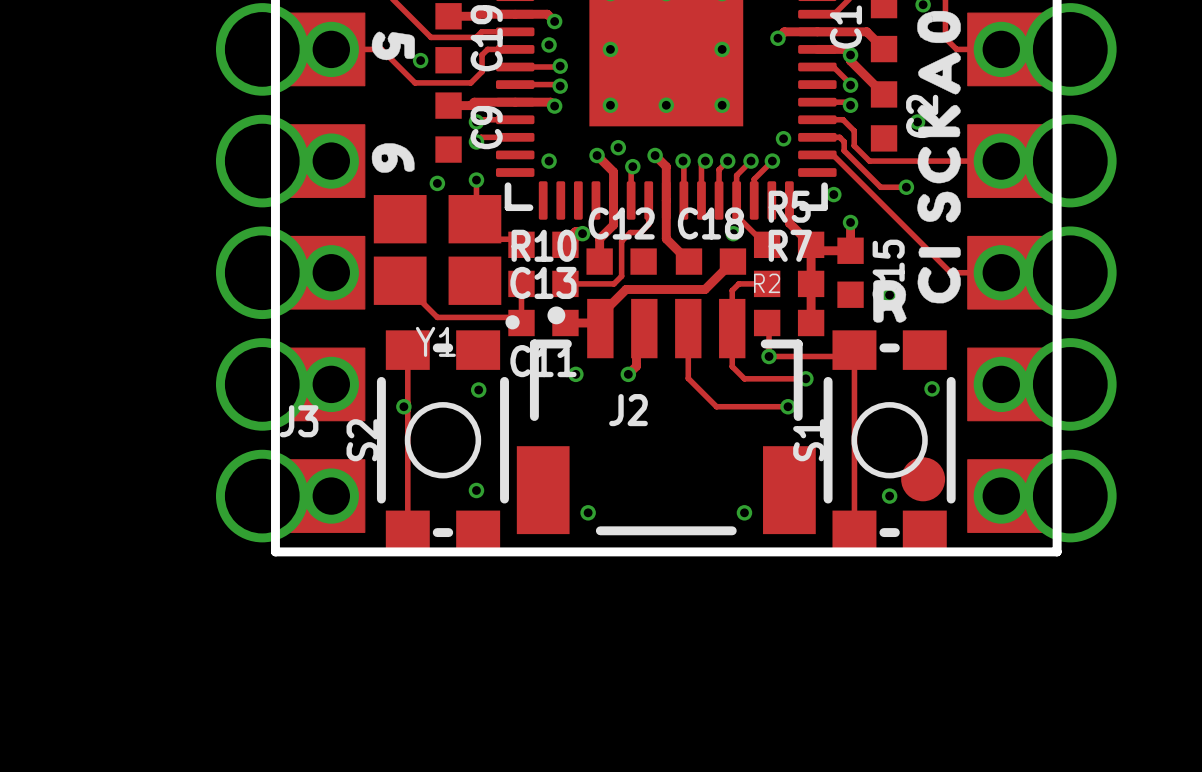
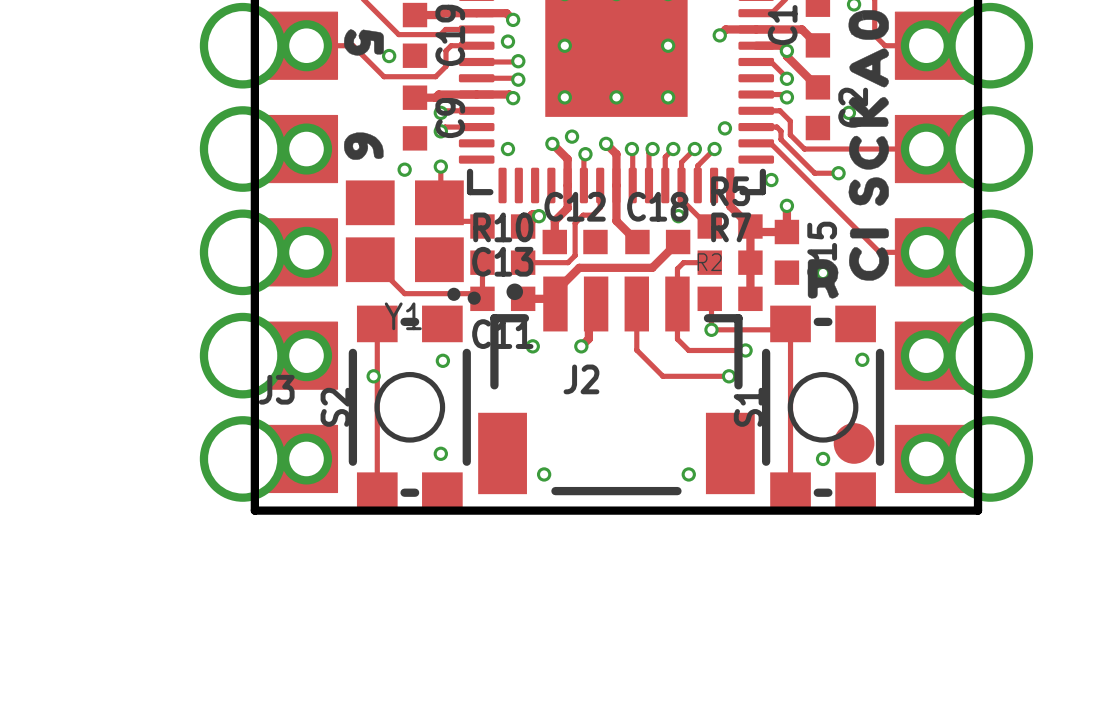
drawing: none -> [447, 287, 461, 301]

